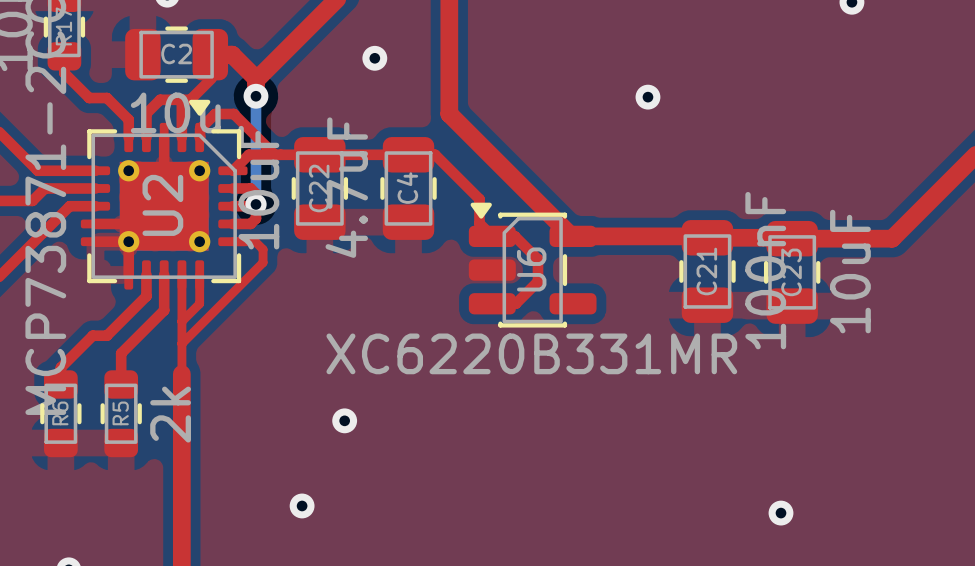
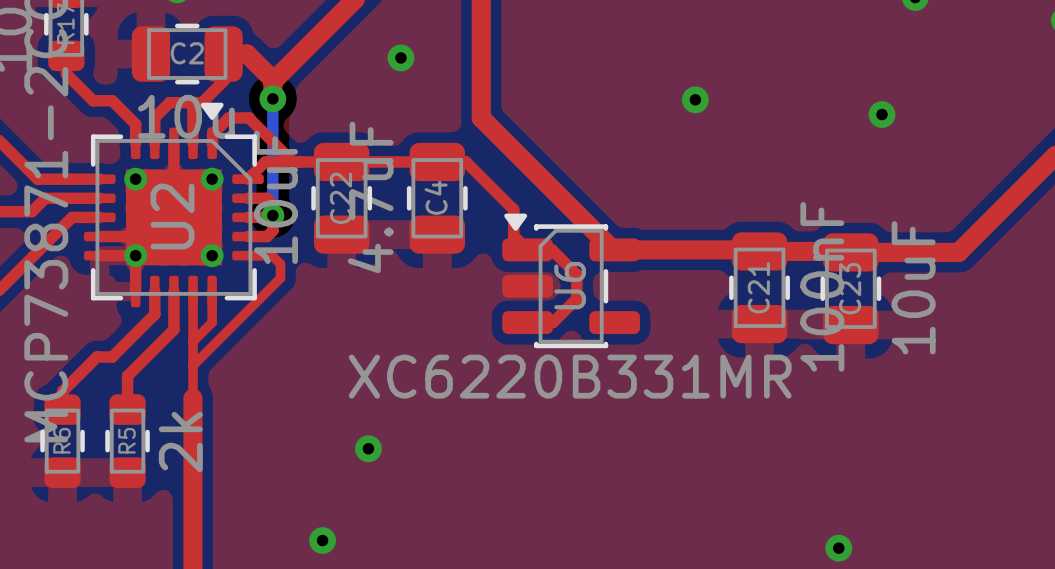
via: none -> (882, 114)

